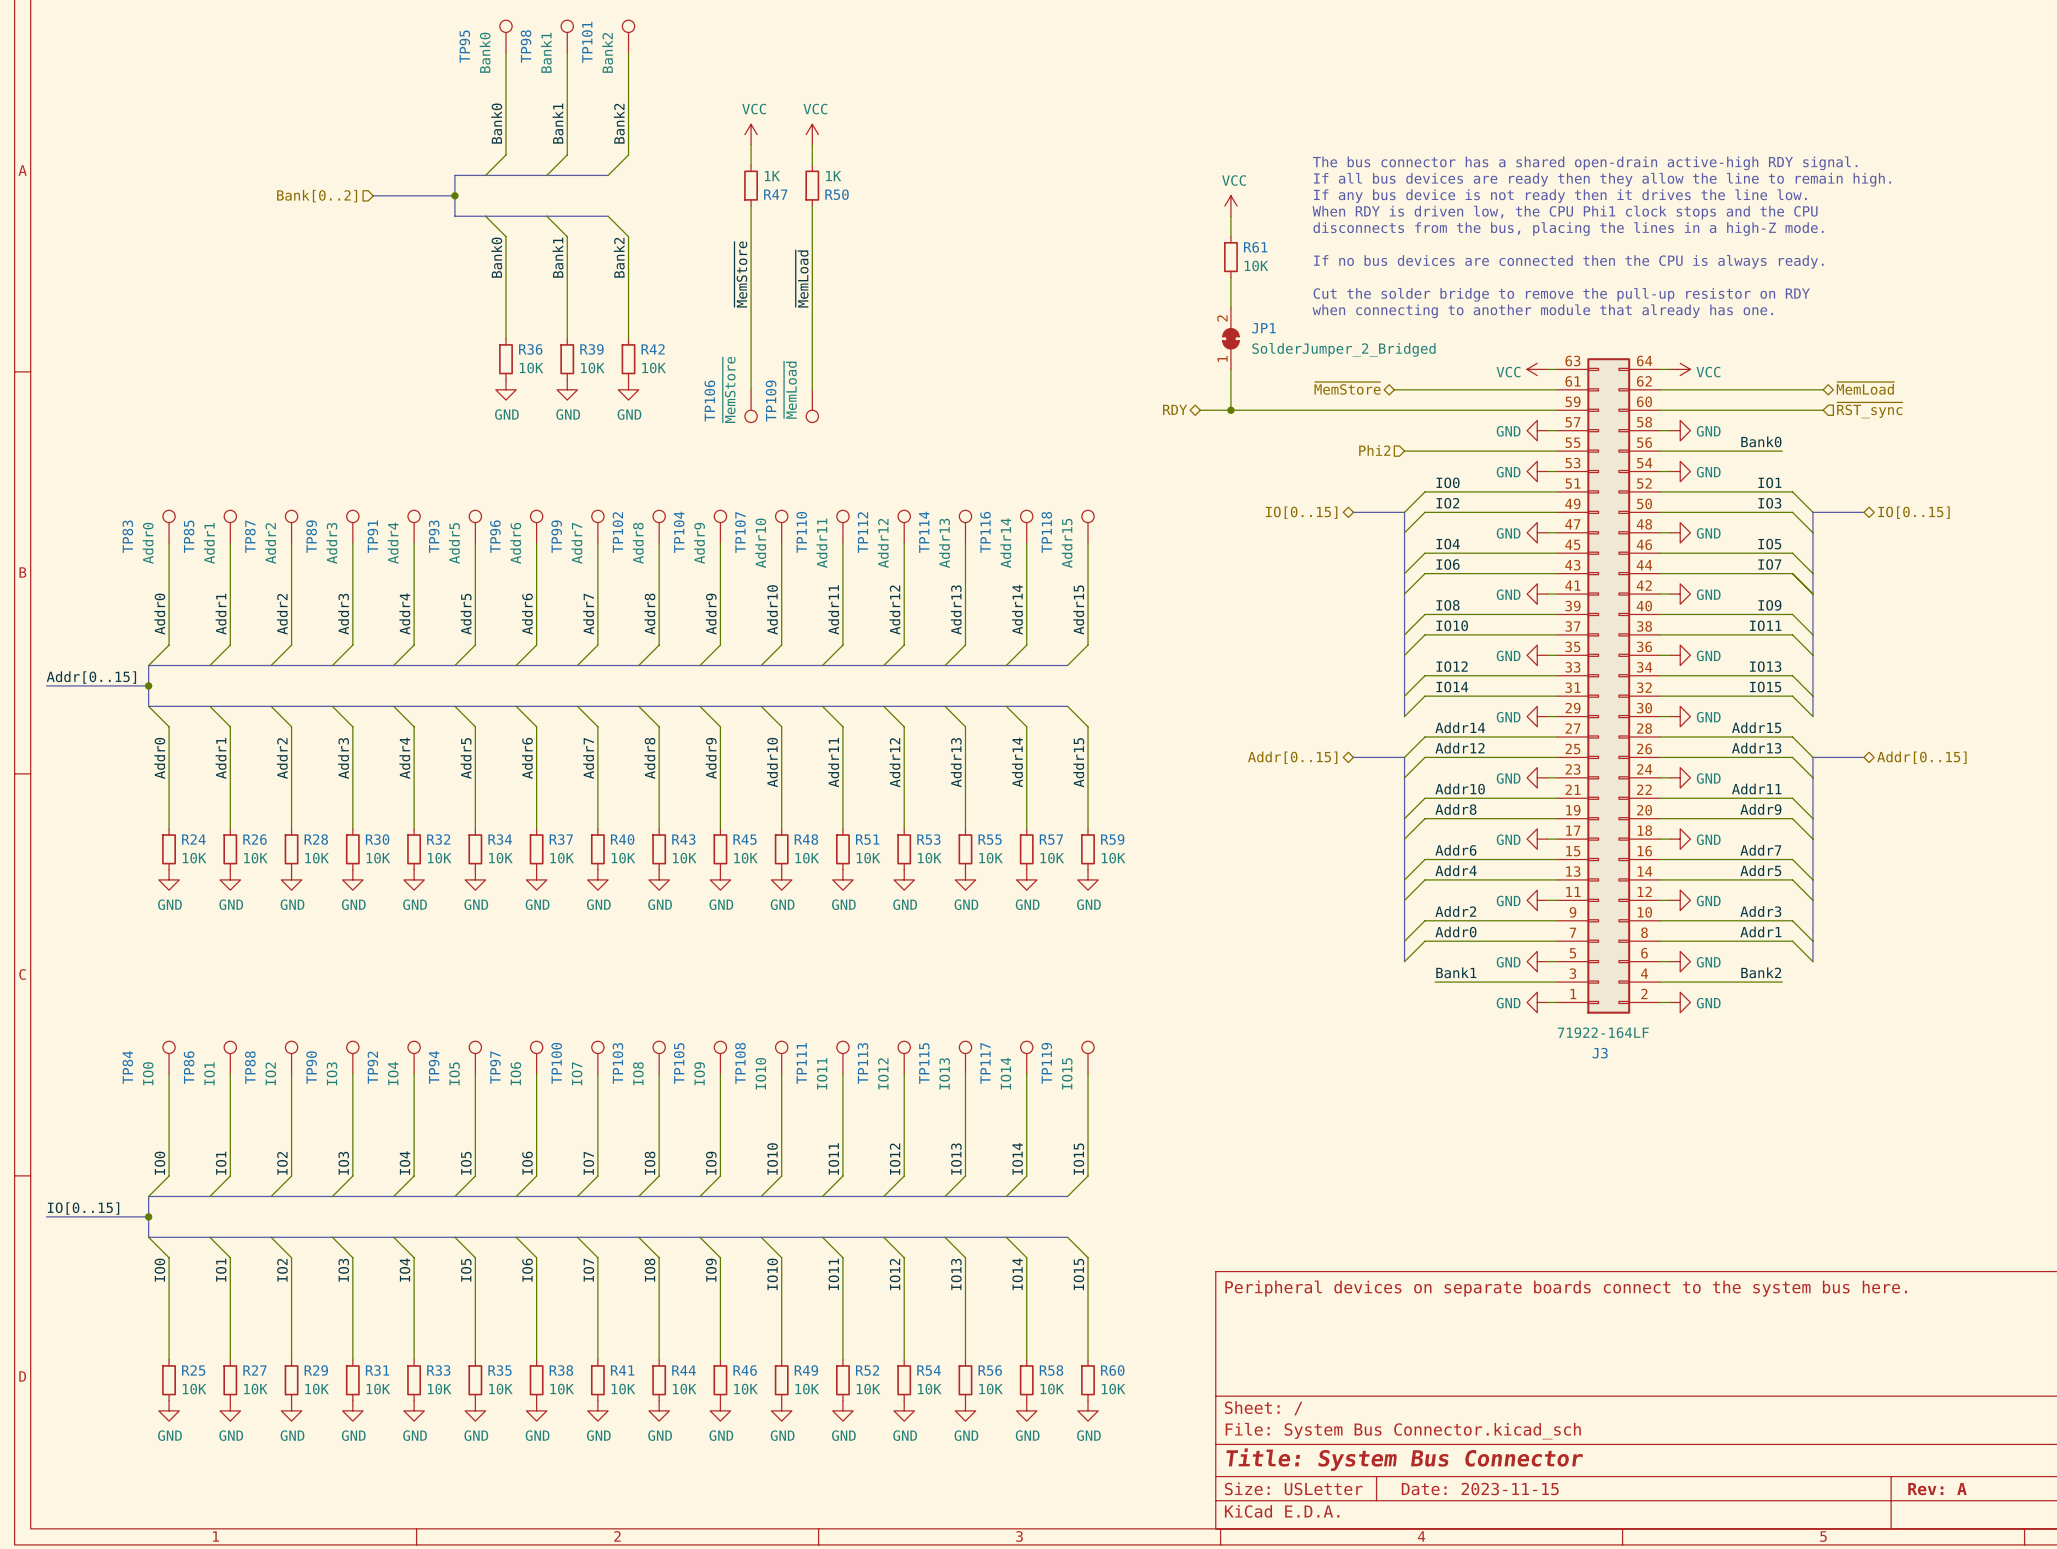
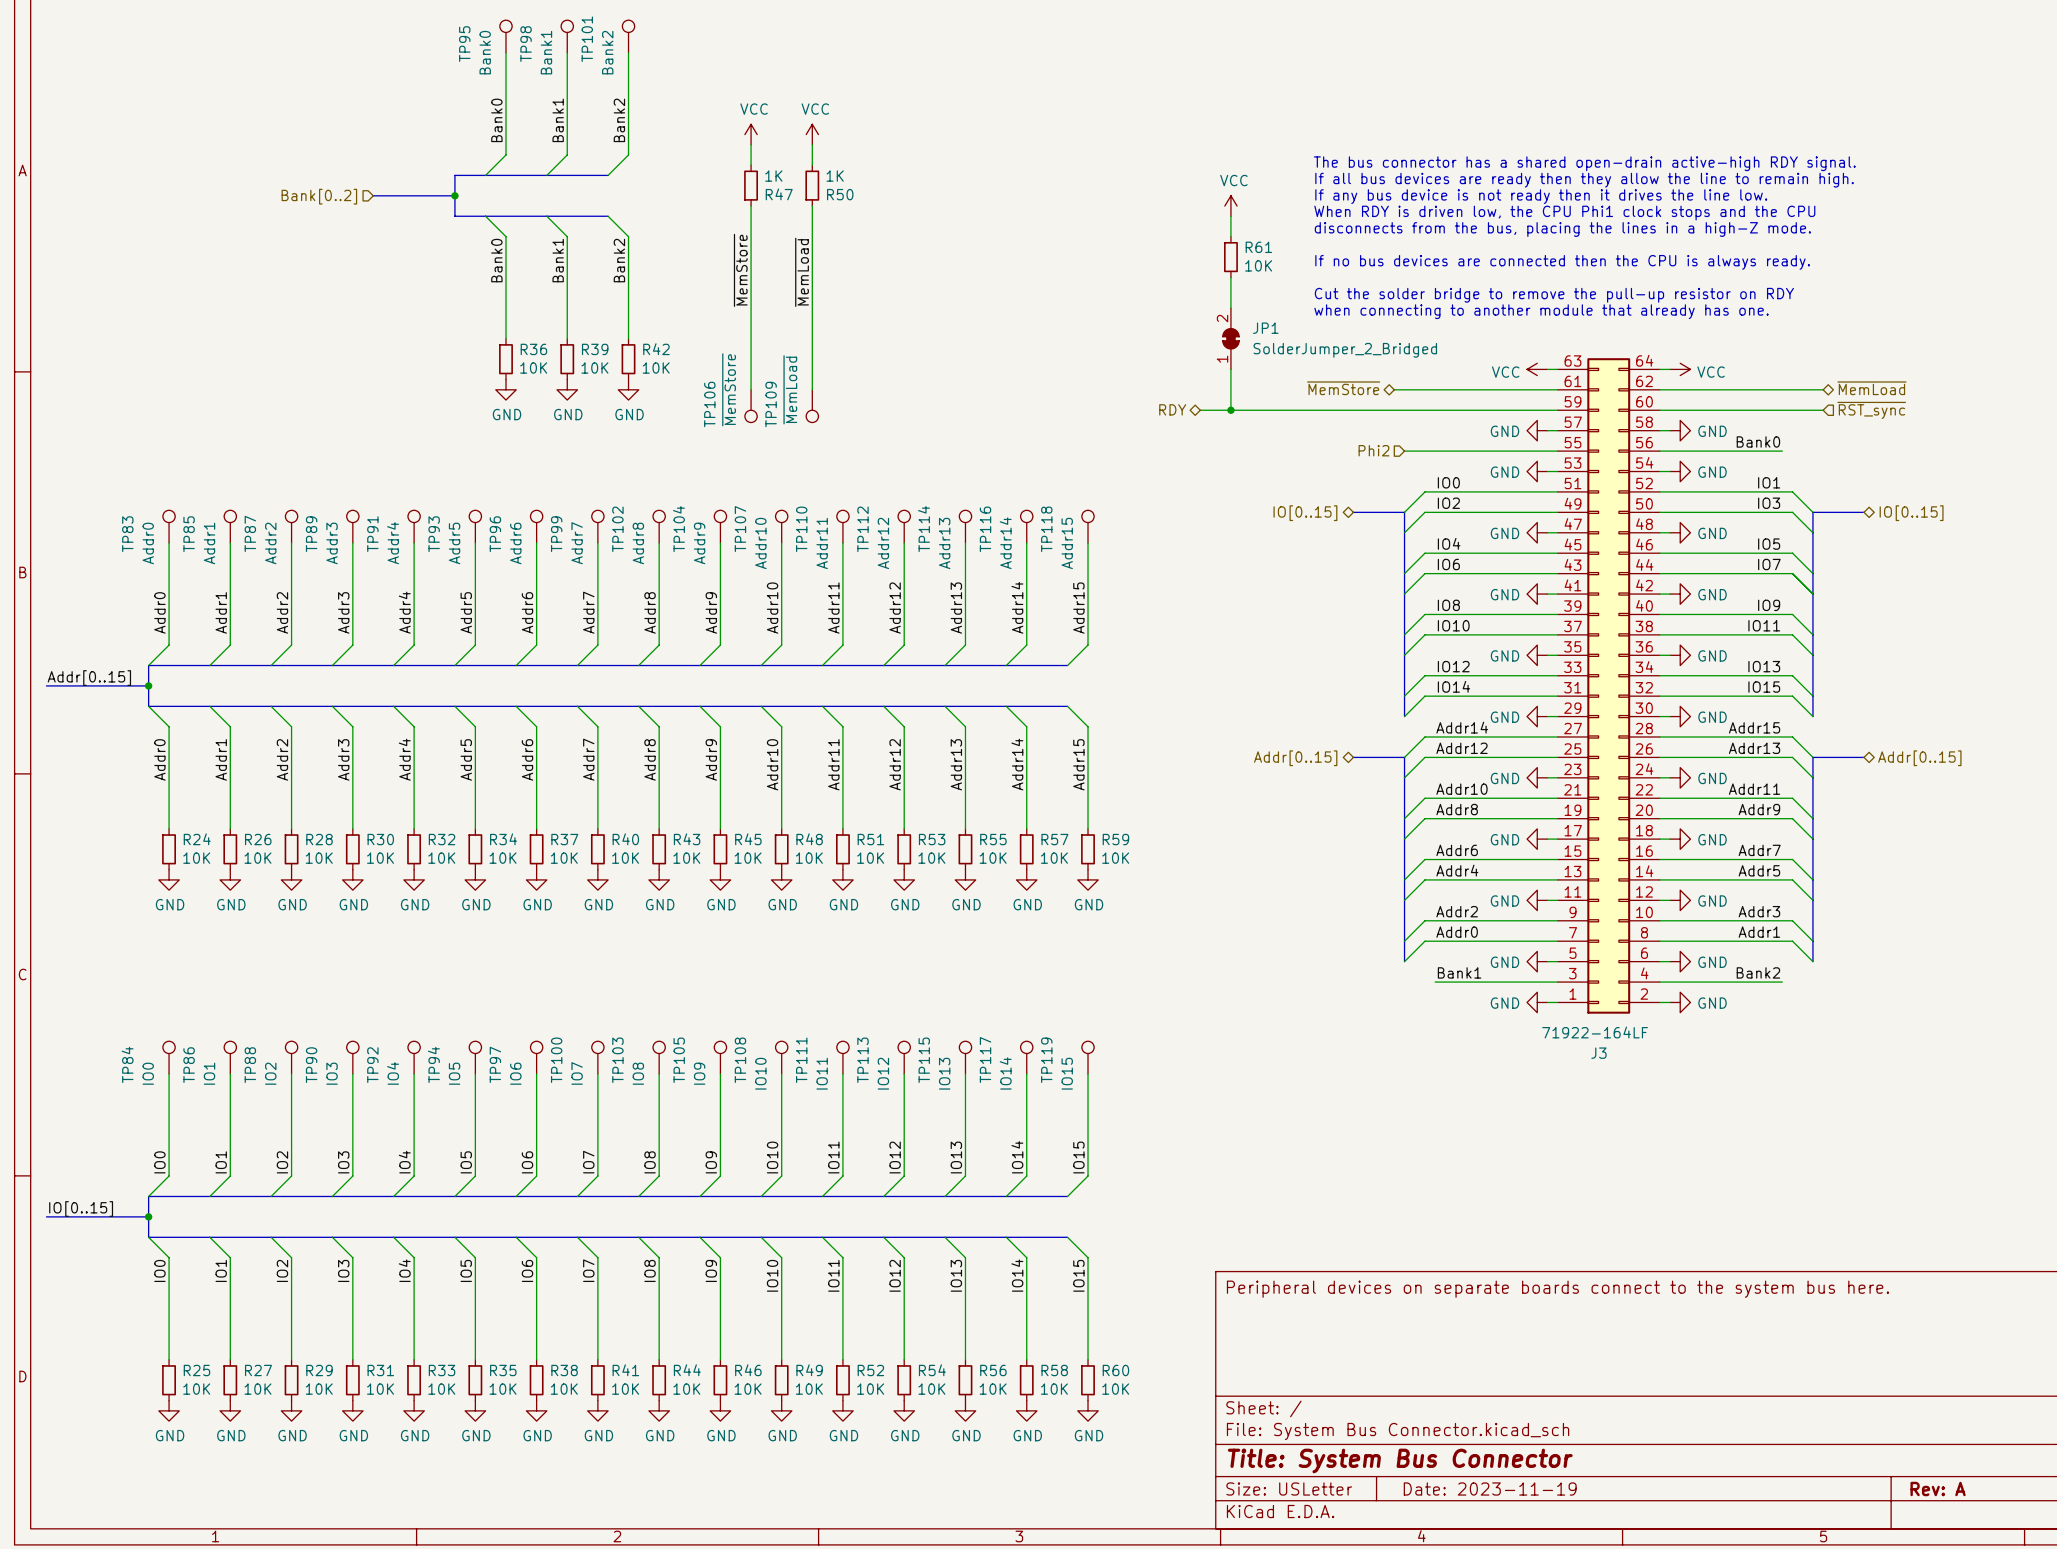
title block: Date: 2023-11-15 (1480, 1489) -> Date: 2023-11-19 (1490, 1489)

